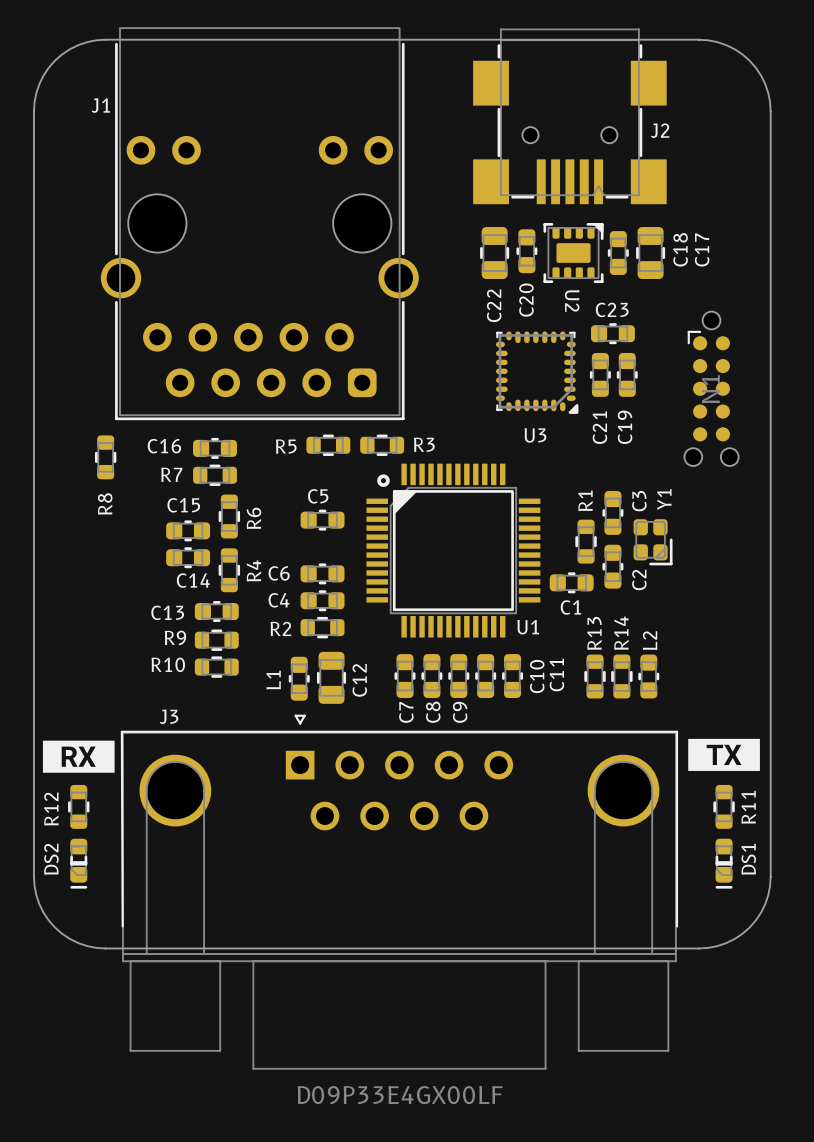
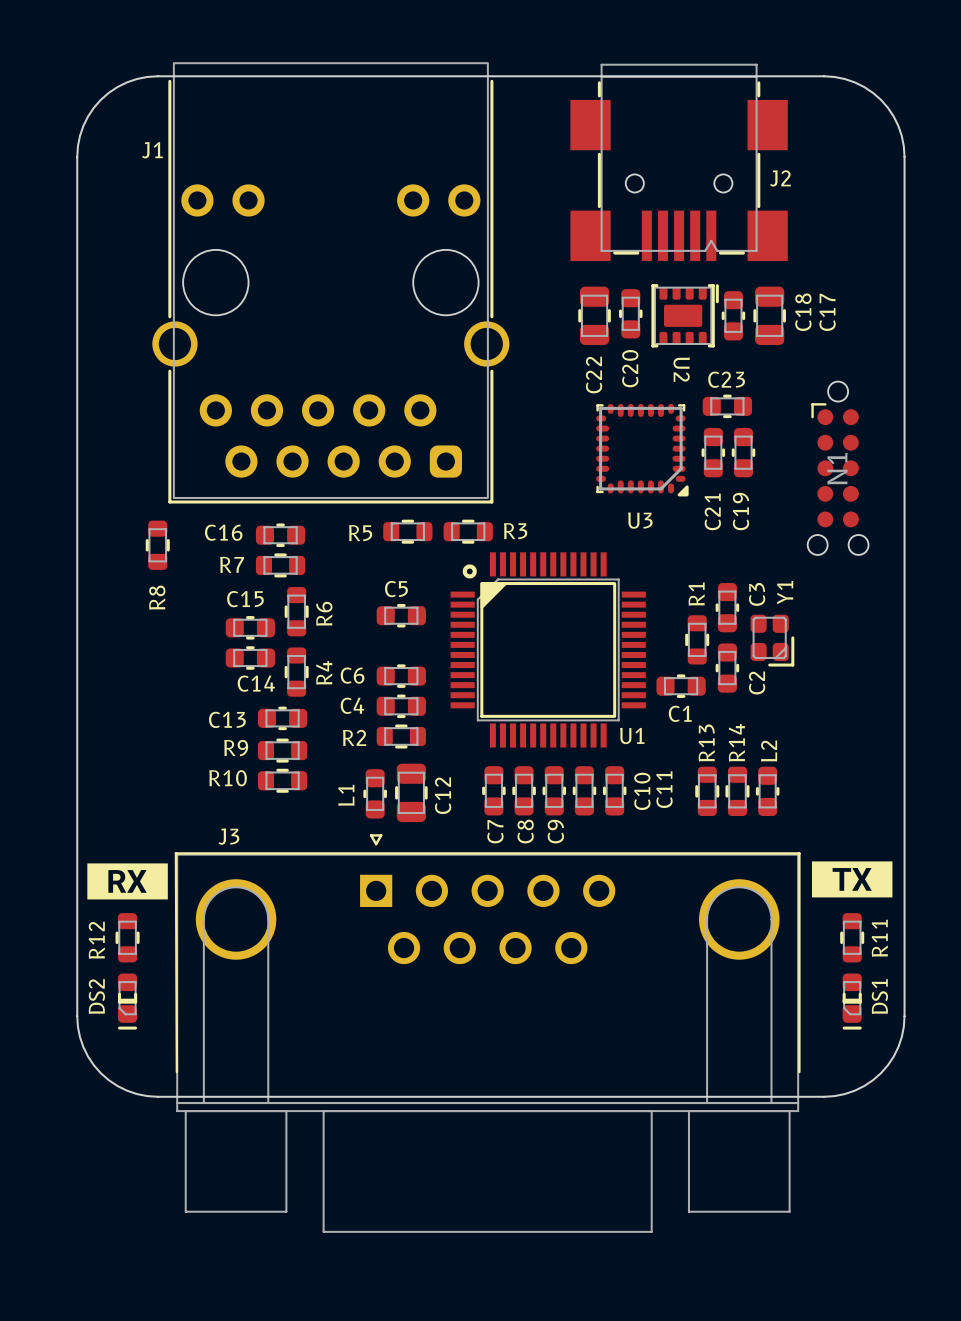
U2 footprint: [543, 222, 604, 284] -> [651, 284, 719, 348]
J3 value: D09P33E4GX00LF (400, 1095) -> none

